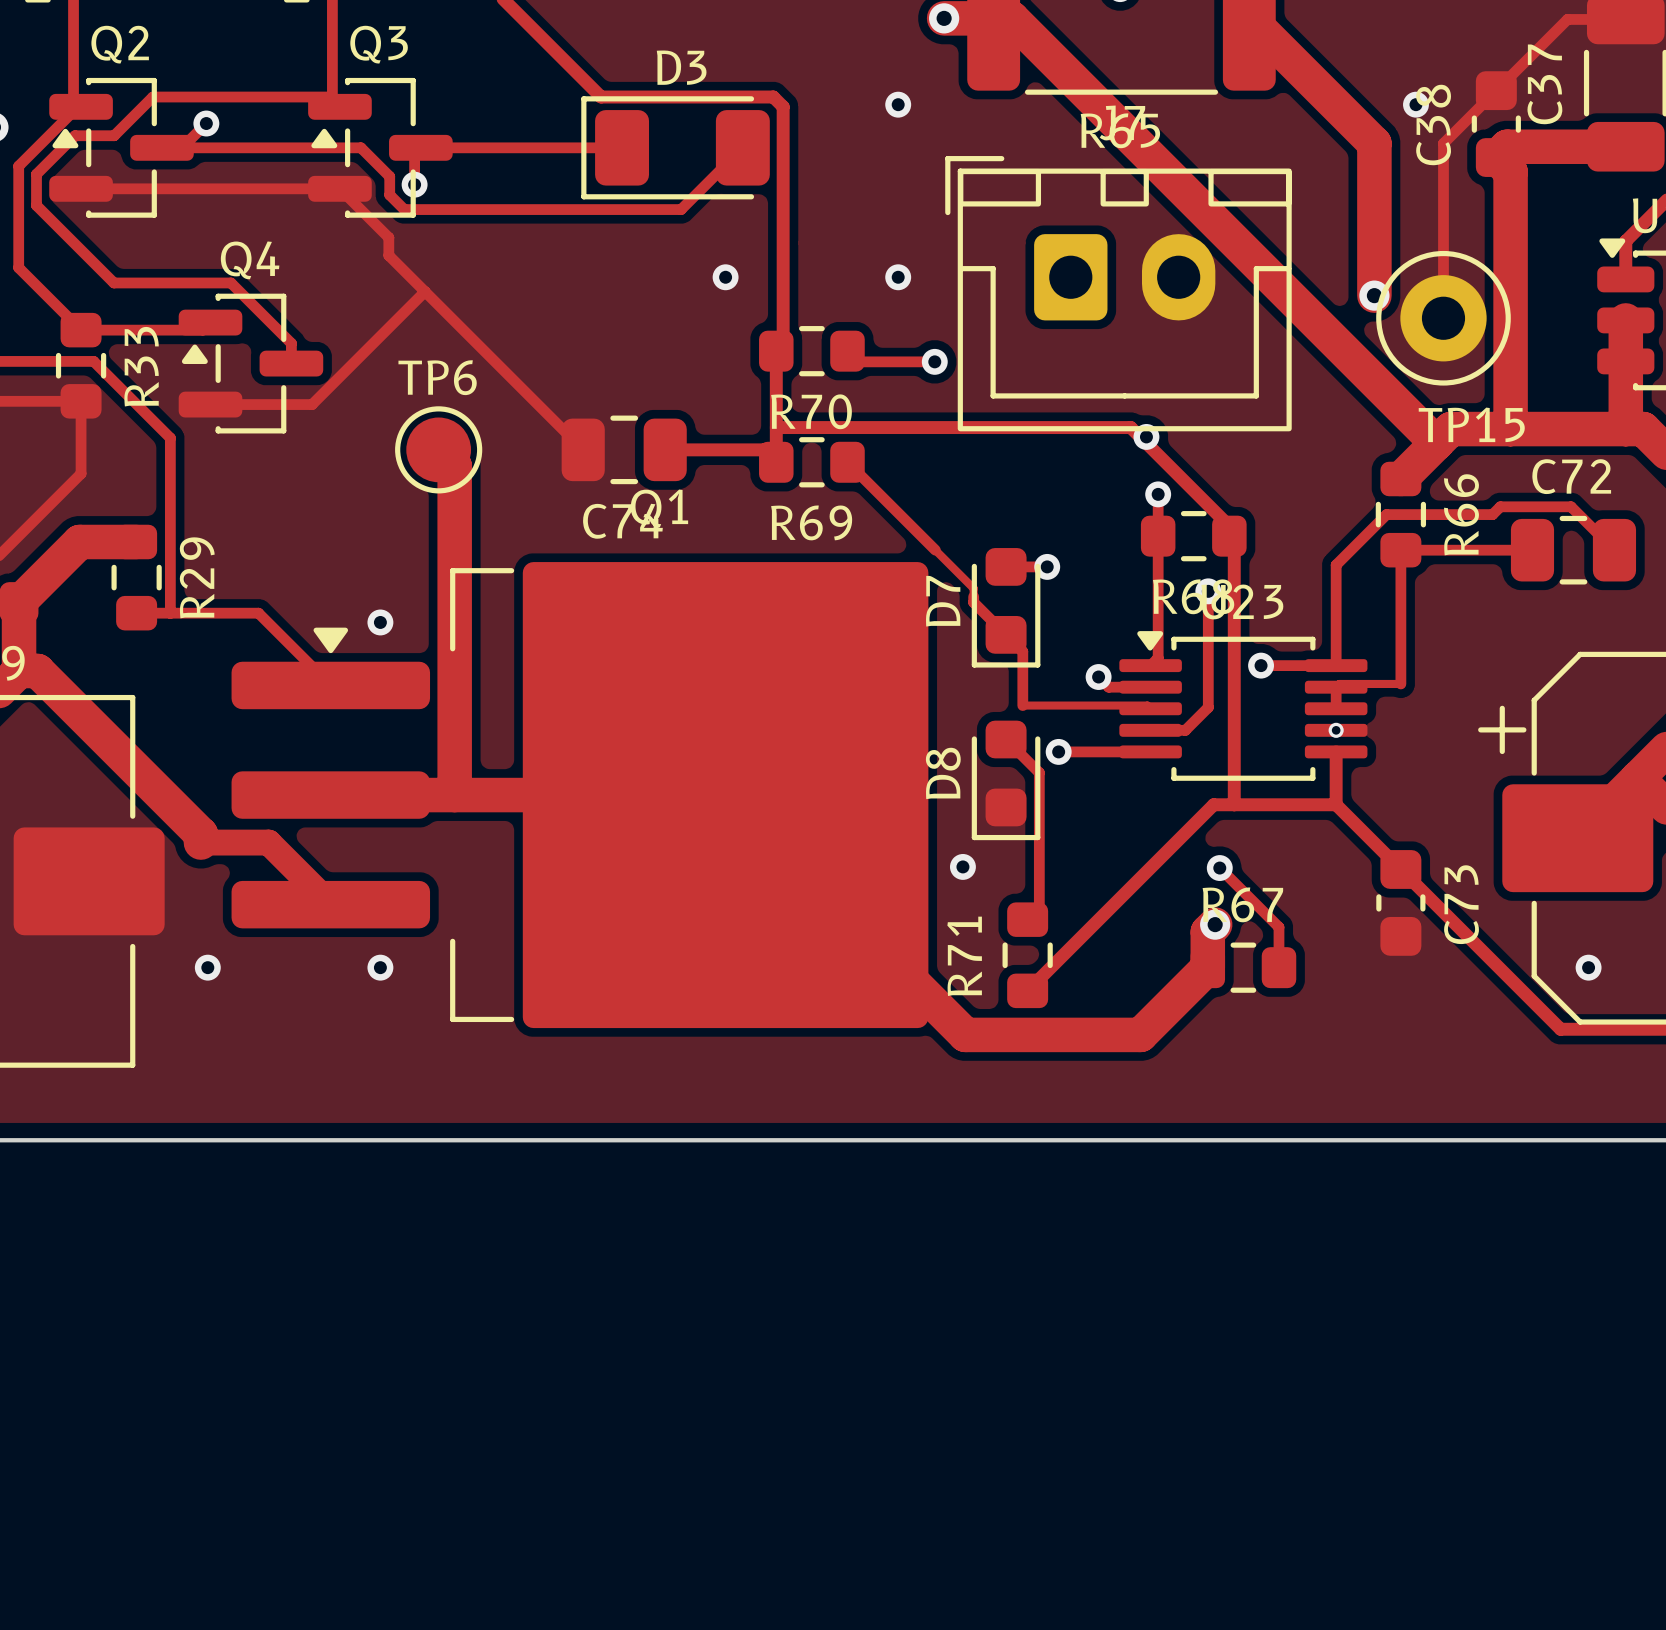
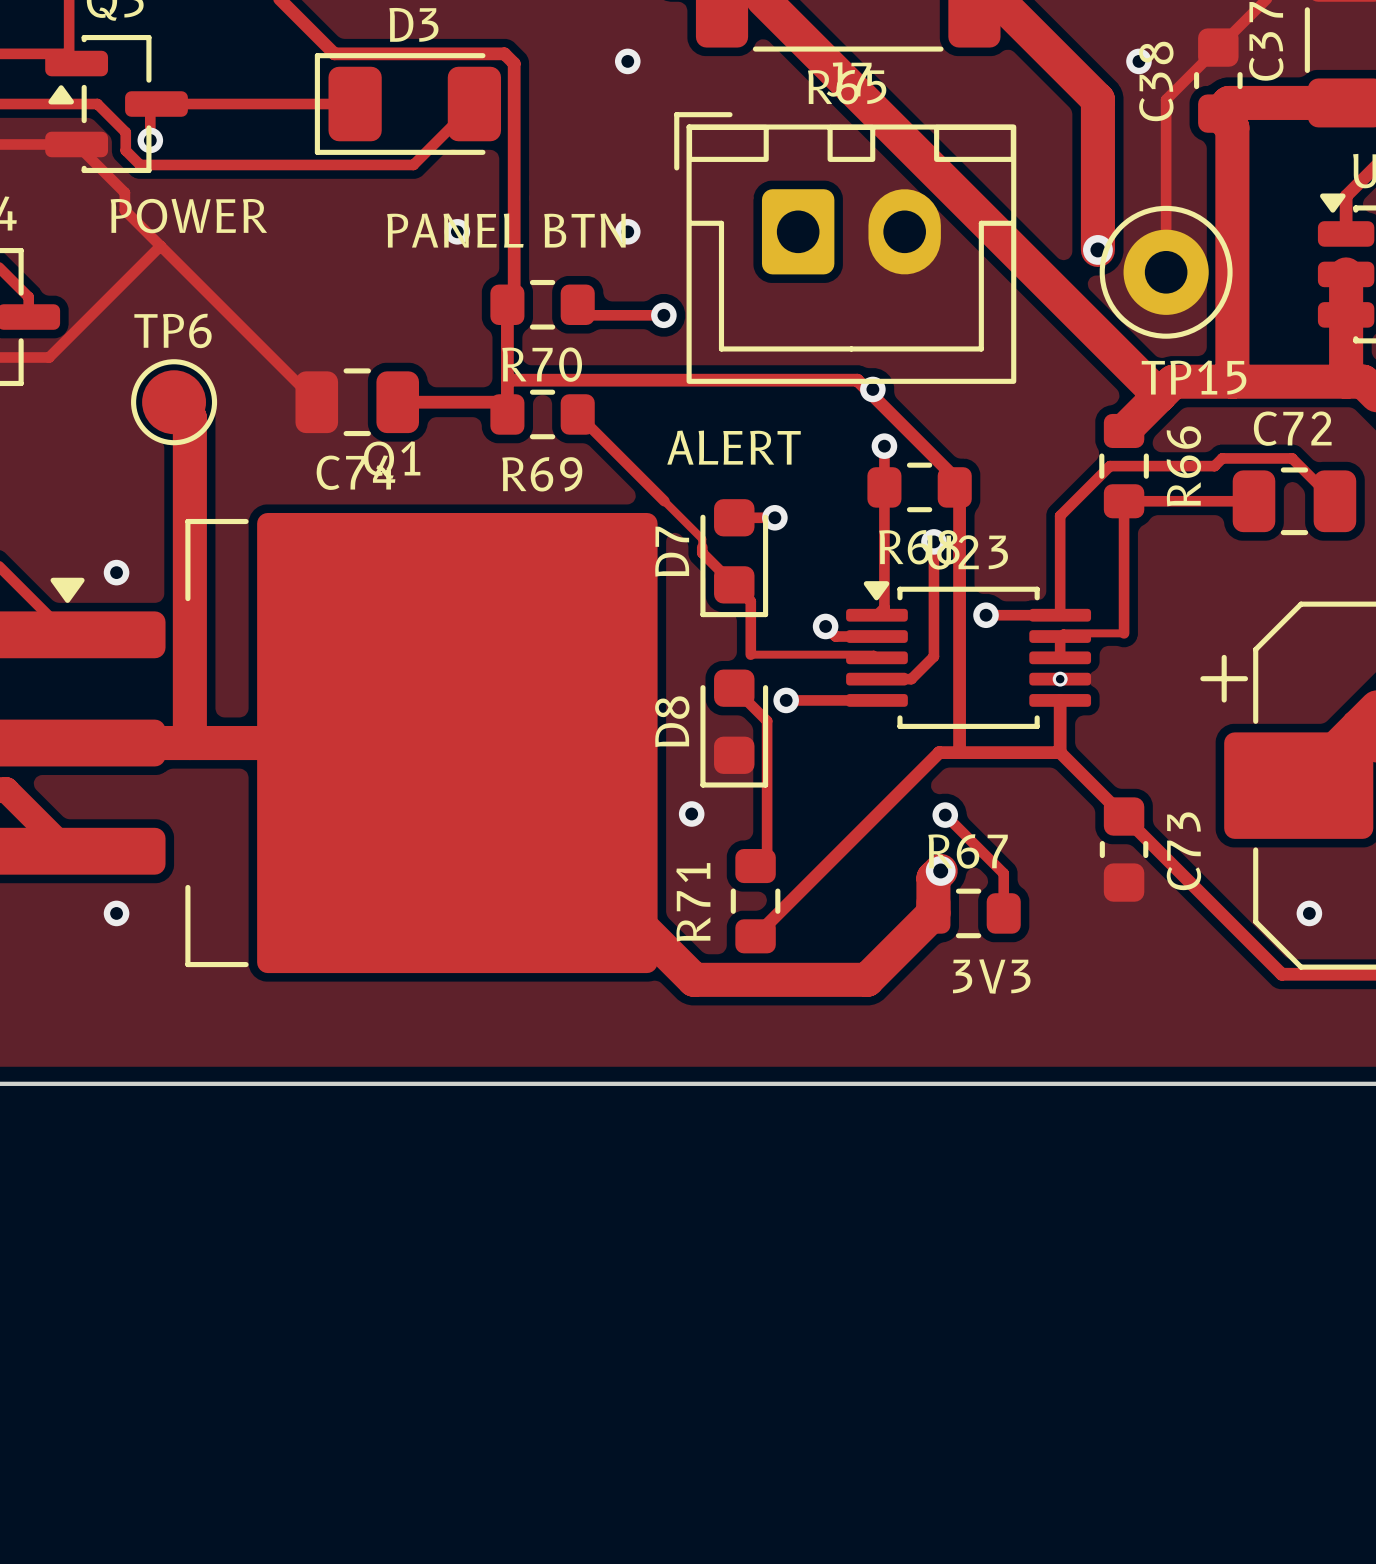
text: none -> POWER (188, 216)
text: none -> PANEL BTN (506, 230)
text: none -> ALERT (734, 447)
text: none -> 3V3 (991, 976)

